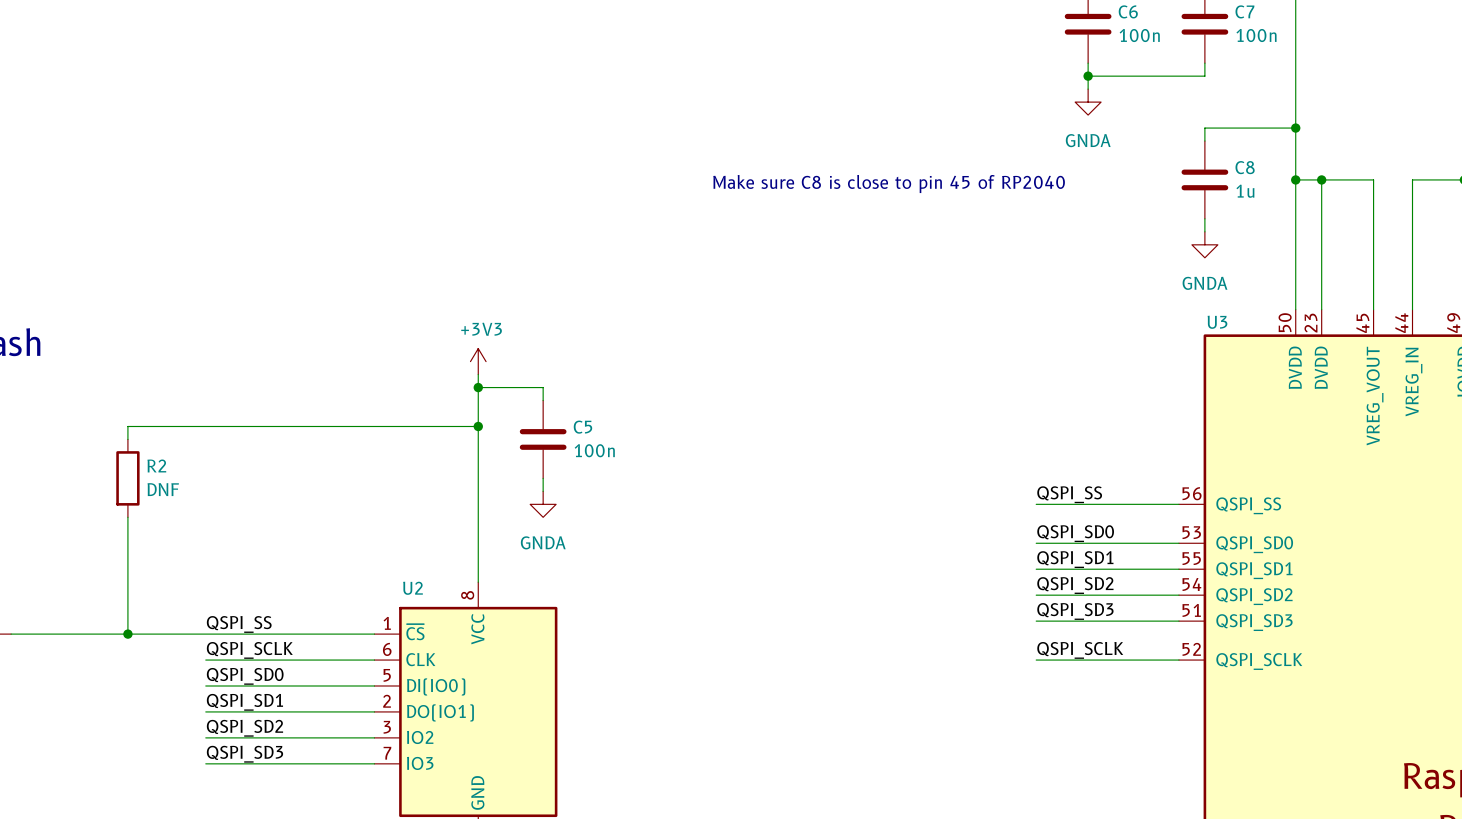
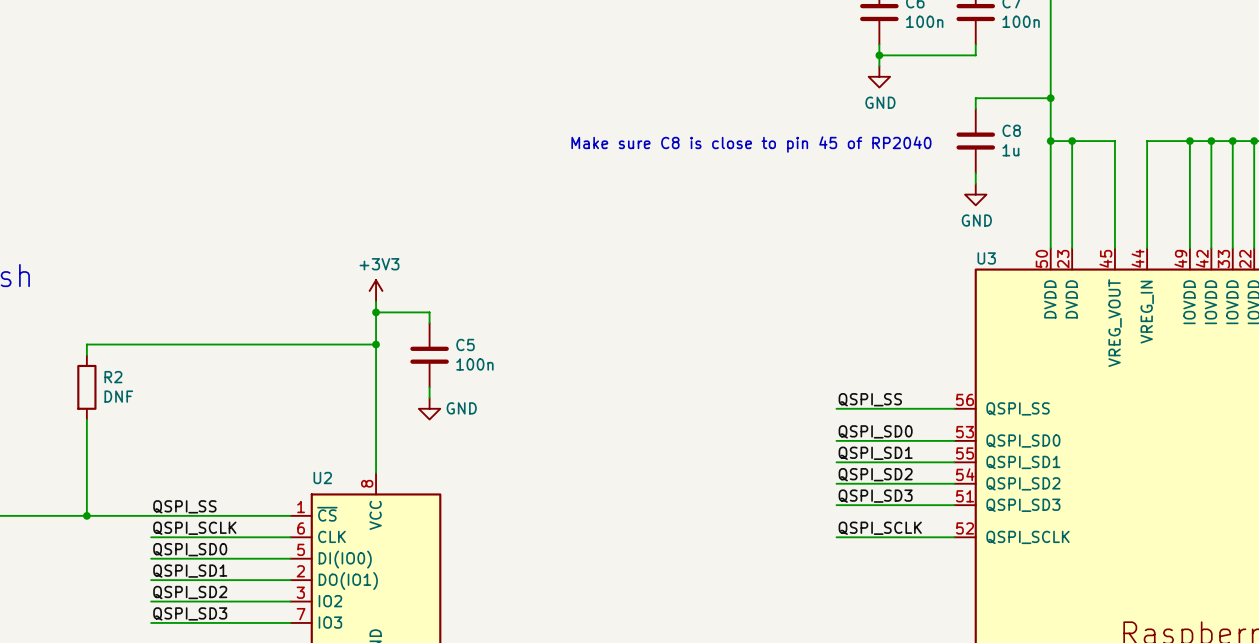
power symbol: GNDA (1088, 102) -> GND (879, 76)
power symbol: GNDA (1204, 244) -> GND (975, 194)
power symbol: GNDA (543, 504) -> GND (429, 408)

